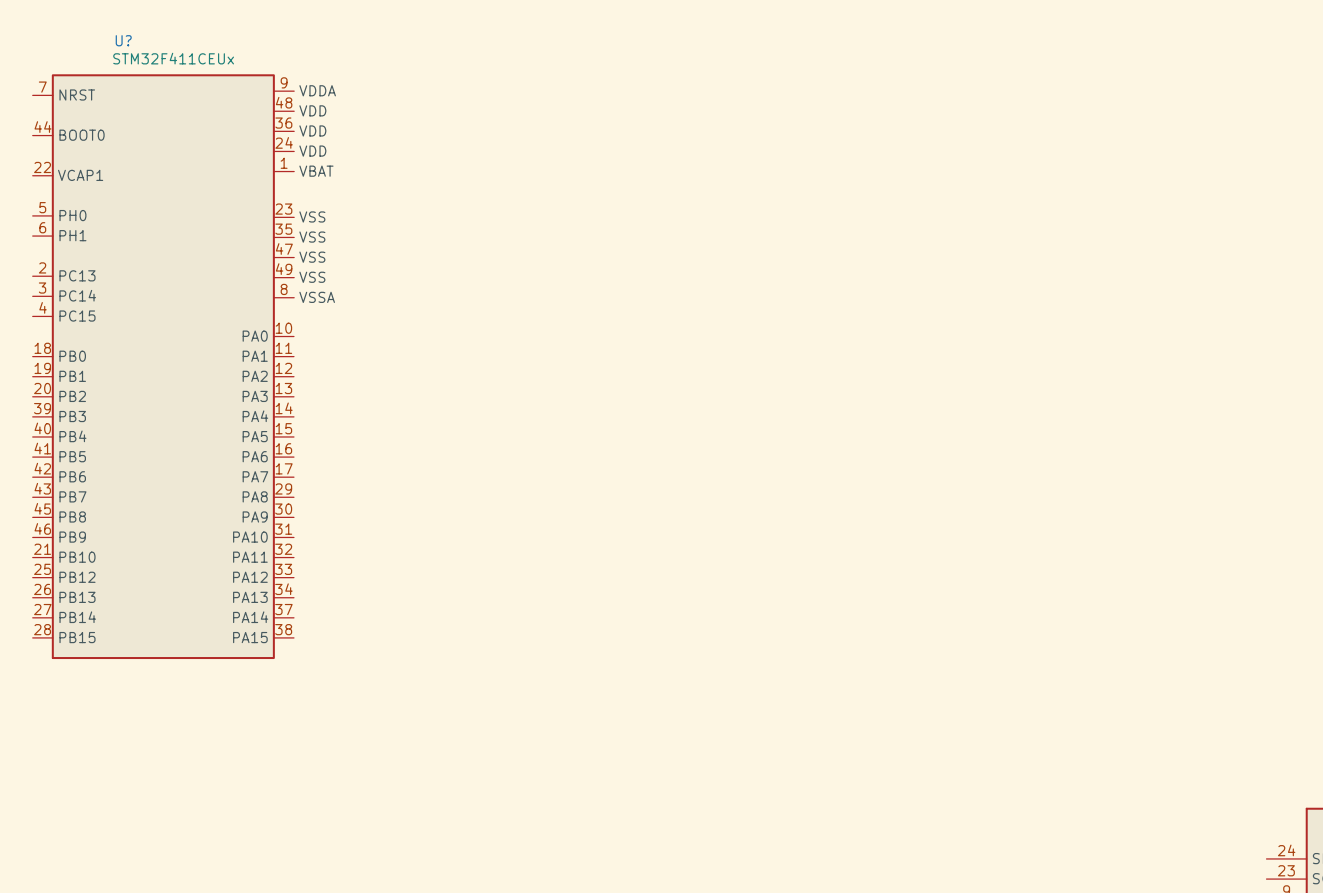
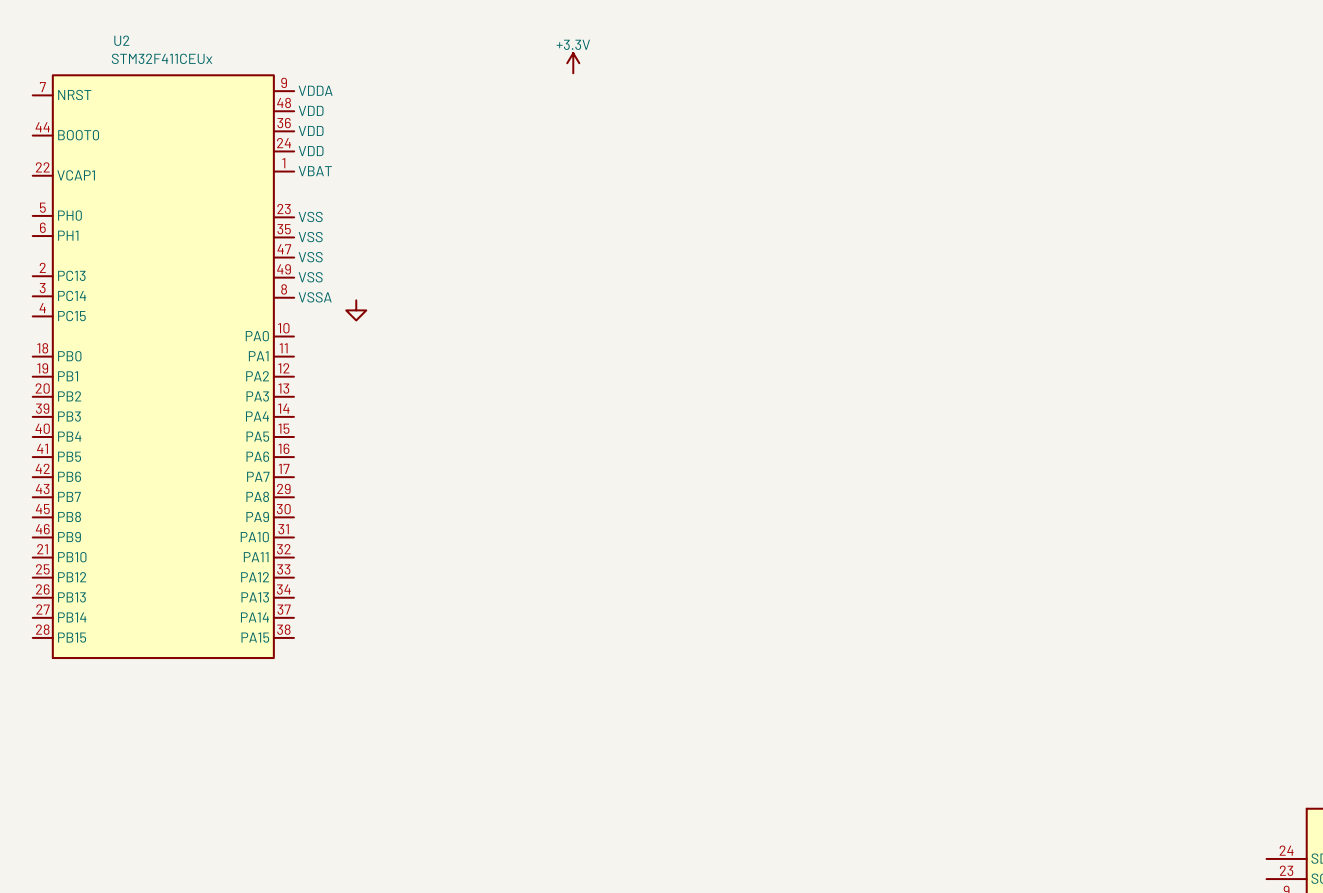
U? name: U? (123, 40) -> U2 (121, 40)
power symbol: none -> +3.3V (573, 63)
power symbol: none -> (356, 310)

